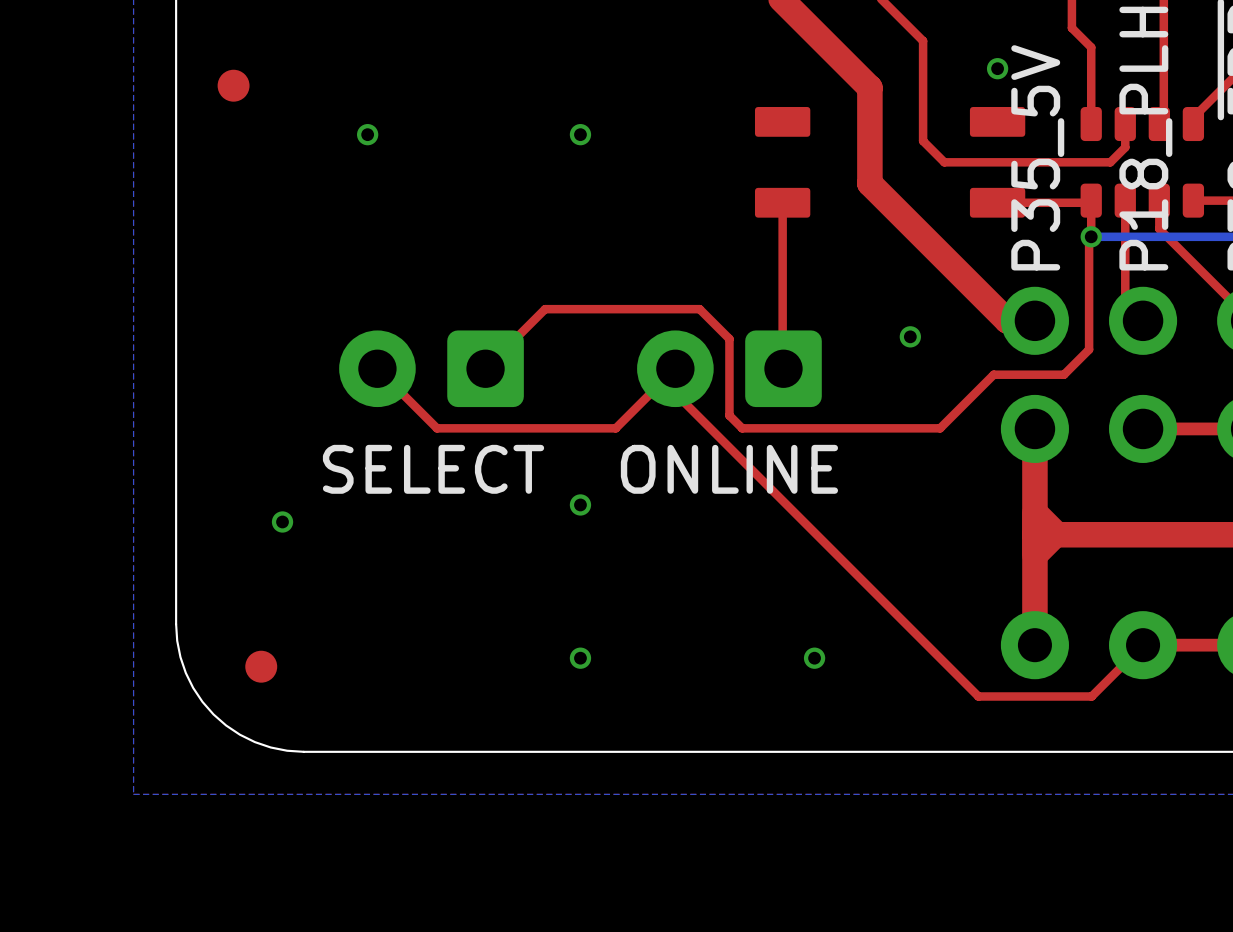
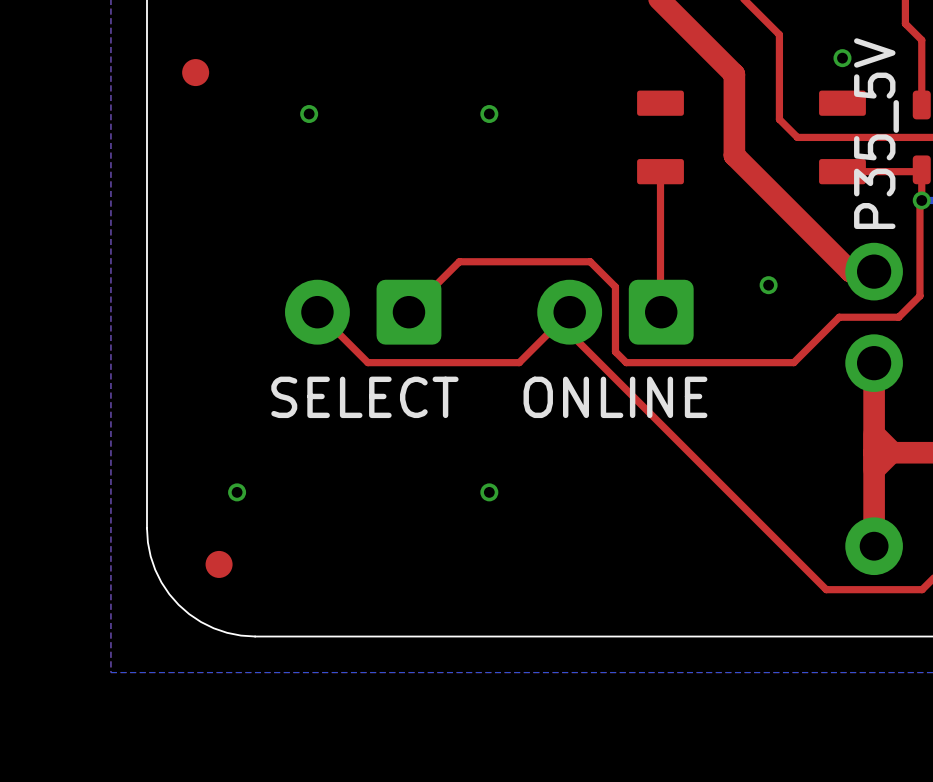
via: (580, 504) -> none
via position: (282, 521) -> (237, 492)
via: none -> (489, 492)
via: (580, 658) -> none
via: (814, 658) -> none

